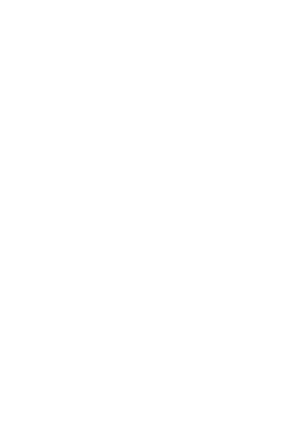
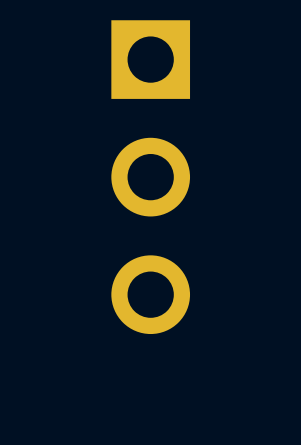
part: none -> (150, 177)

